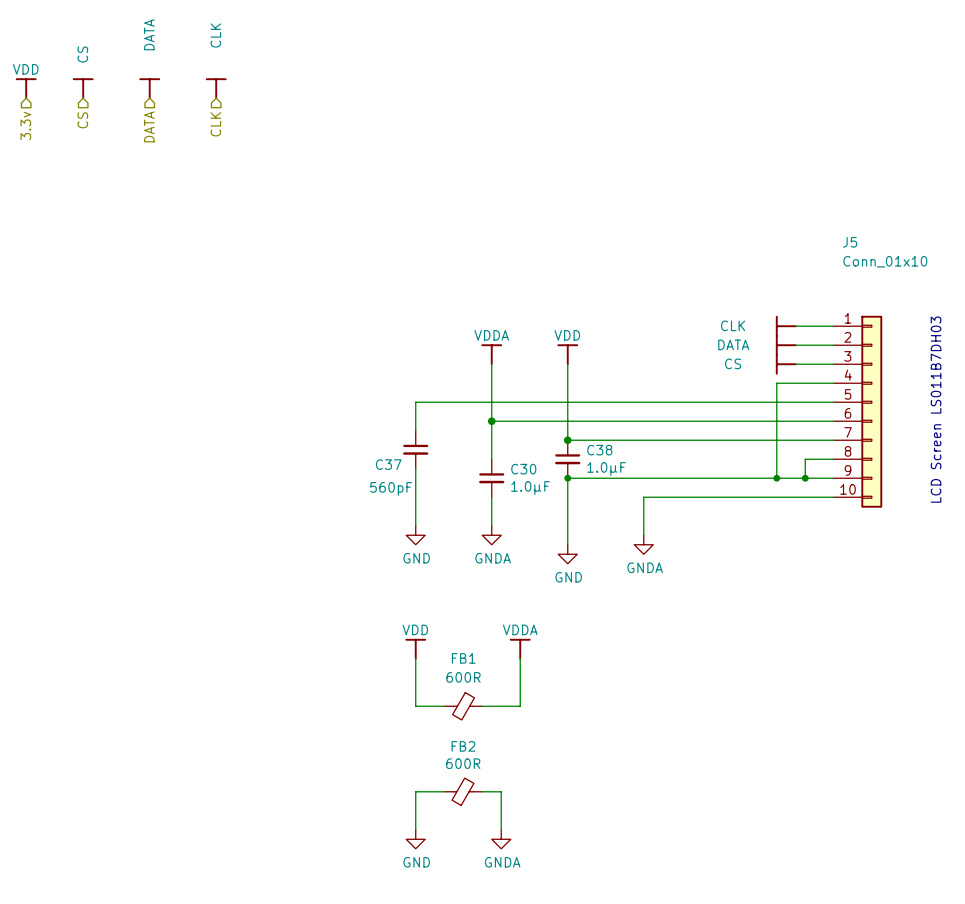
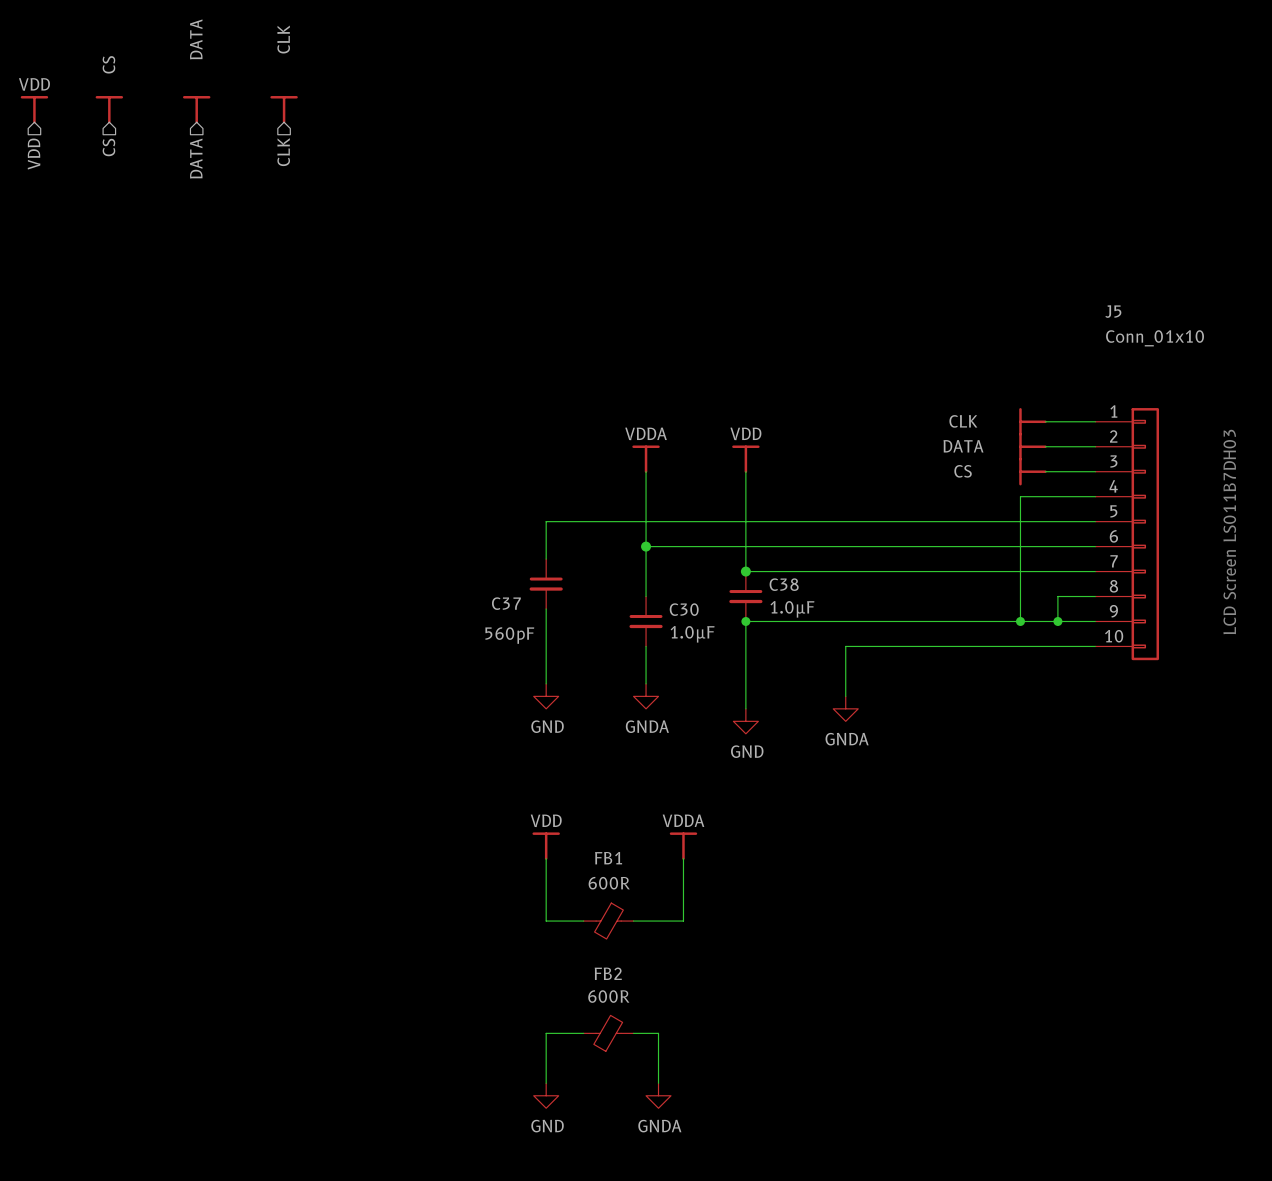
hierarchical label: 3.3v (25, 125) -> VDD (34, 154)

